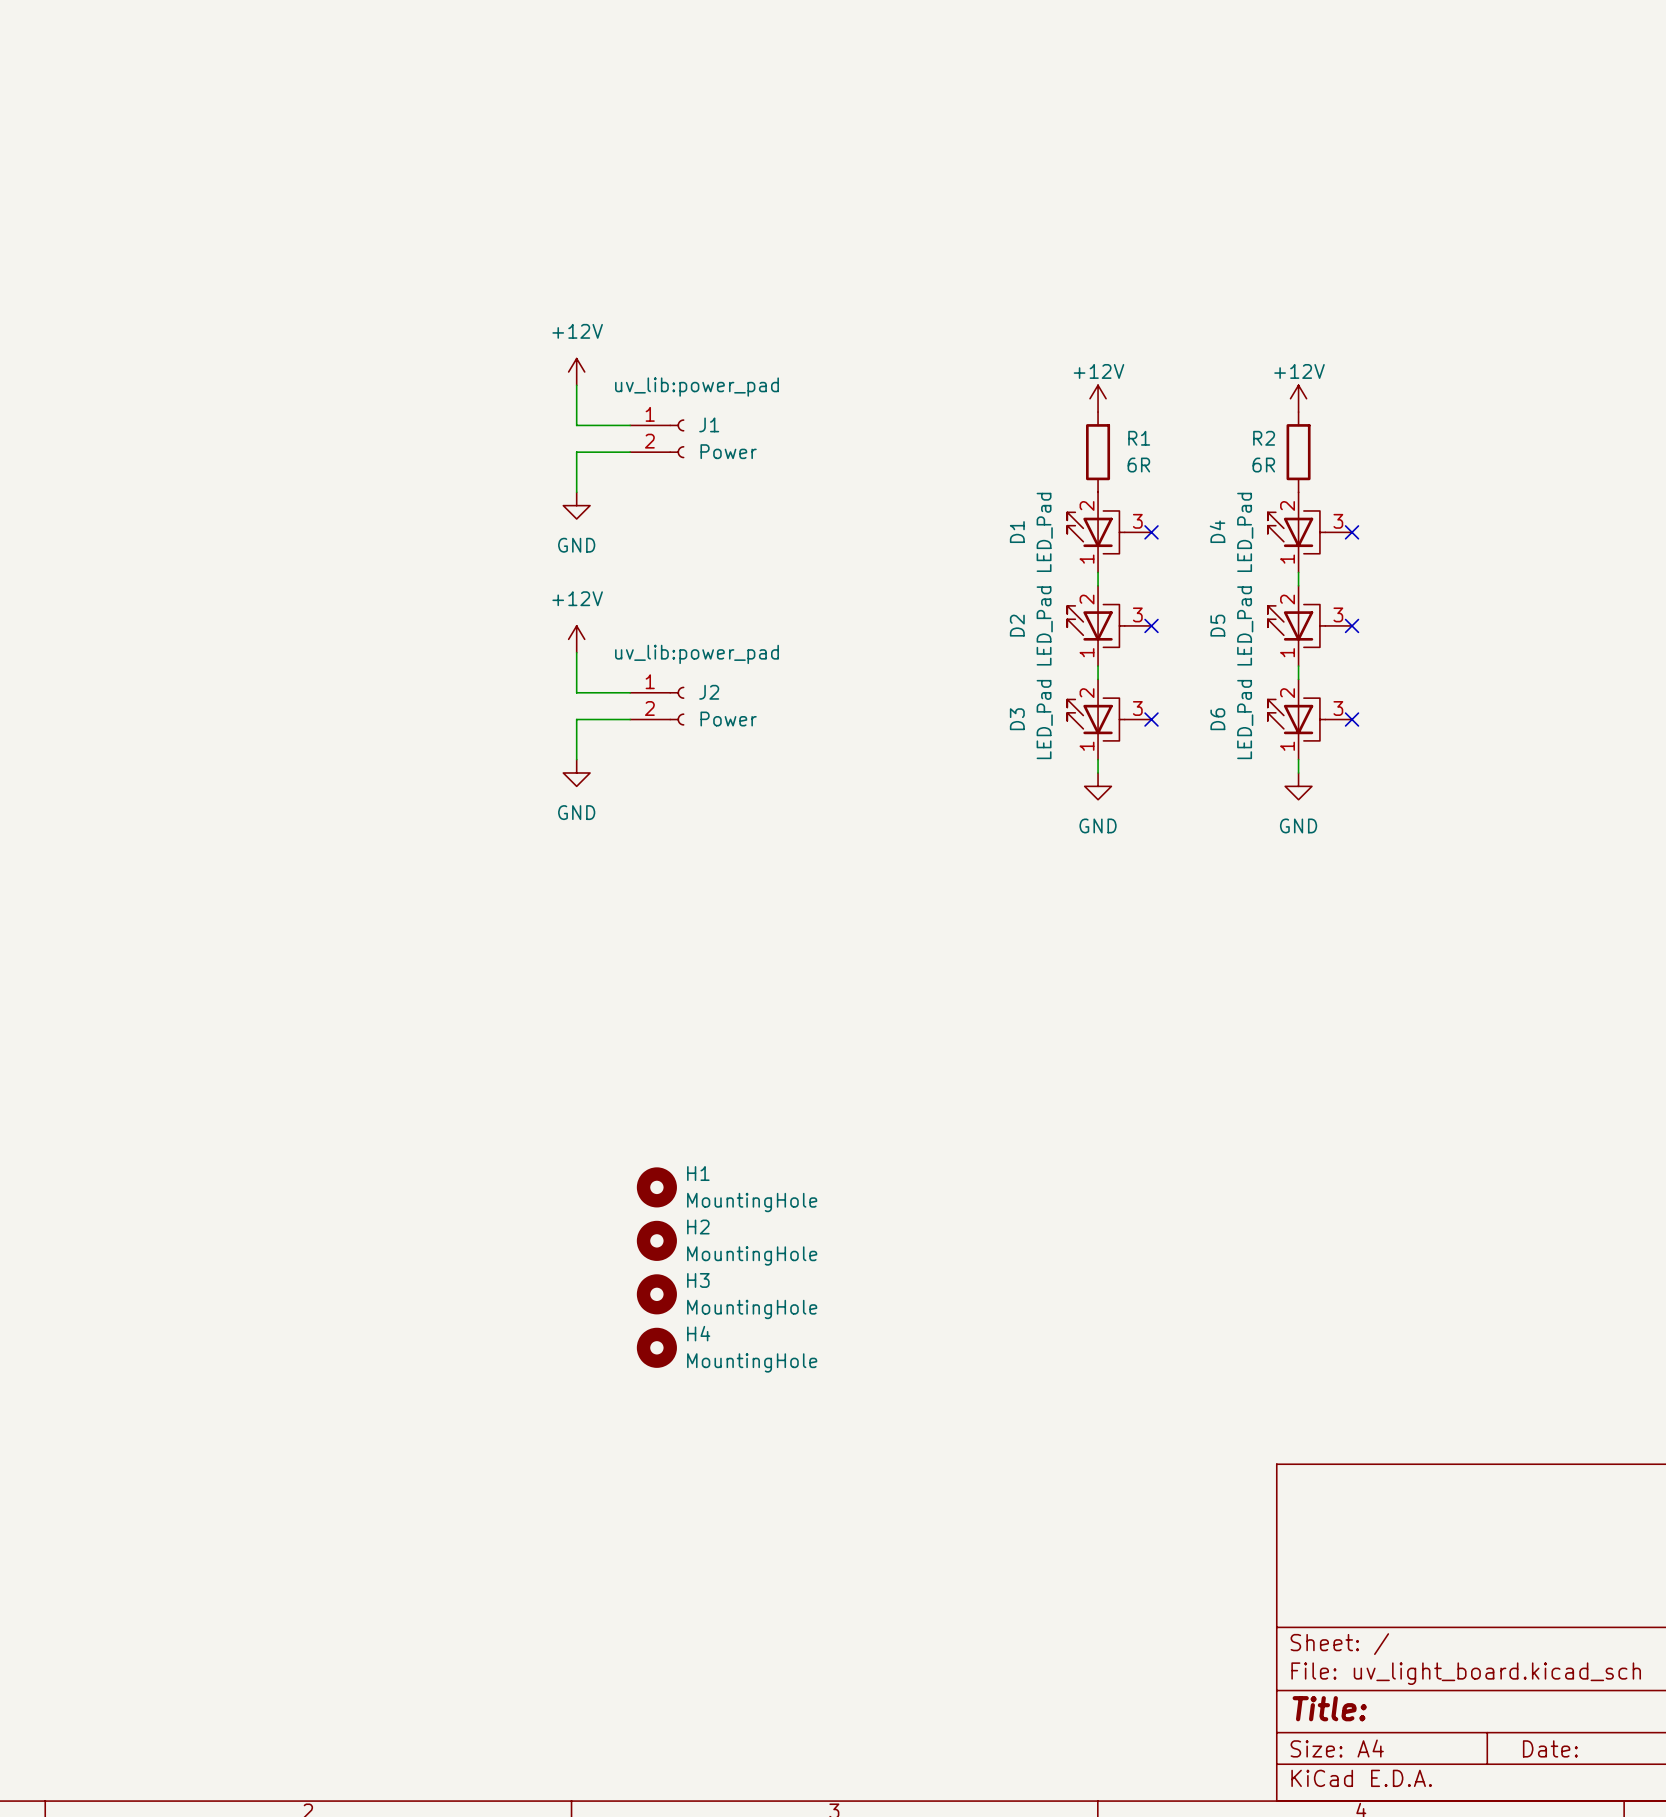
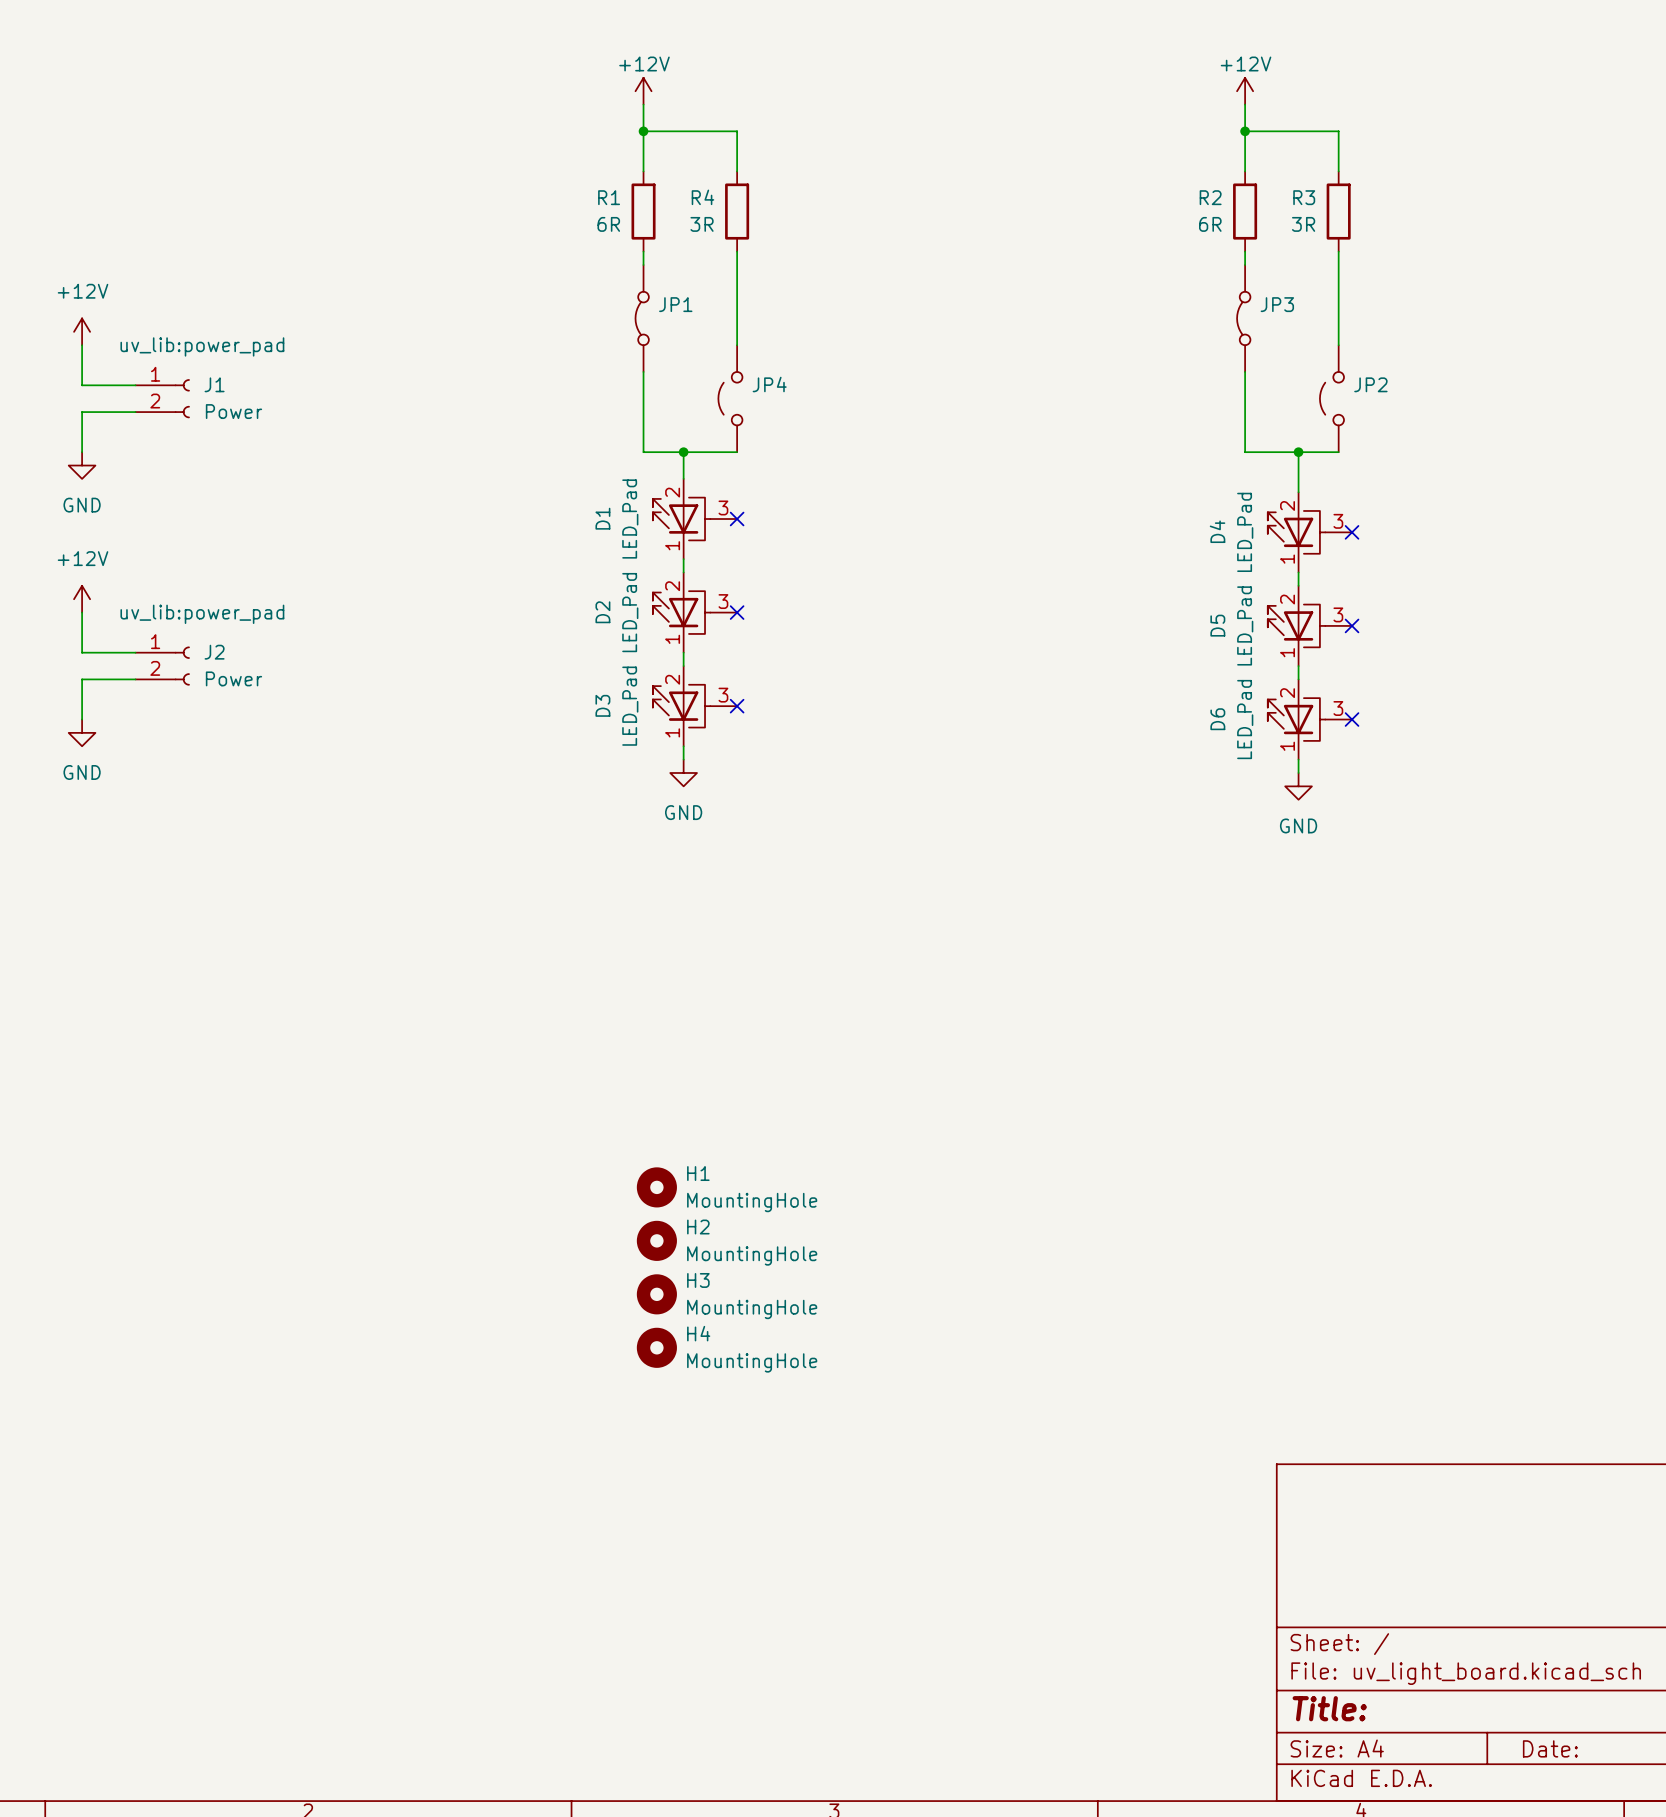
power symbol: none -> +12V (643, 91)
power symbol: none -> +12V (1245, 91)
wire: none -> (643, 104) (643, 171)
wire: none -> (1245, 104) (1245, 171)
wire: none -> (643, 131) (737, 131) (737, 171)
junction: none -> (643, 131)
wire: none -> (1245, 131) (1338, 131) (1338, 171)
junction: none -> (1245, 131)
R4: none -> 3R (737, 211)
R3: none -> 3R (1338, 211)
wire: none -> (643, 251) (643, 265)
wire: none -> (737, 251) (737, 345)
wire: none -> (1245, 251) (1245, 265)
wire: none -> (1338, 251) (1338, 345)
JP1: none -> (642, 318)
JP3: none -> (1243, 318)
power symbol: none -> +12V (82, 331)
wire: none -> (82, 345) (82, 385) (135, 385)
power symbol: +12V (576, 371) -> none
wire: none -> (643, 371) (643, 452) (737, 452)
wire: none -> (1245, 371) (1245, 452) (1338, 452)
wire: (576, 385) (576, 425) (630, 425) -> none
JP4: none -> (730, 398)
power symbol: +12V (1098, 398) -> none
power symbol: +12V (1298, 398) -> none
JP2: none -> (1331, 398)
wire: none -> (135, 412) (82, 412) (82, 452)
J1 position: (657, 438) -> (162, 398)
R1 name position: R1 (1139, 438) -> R1 (609, 197)
wire: (630, 452) (576, 452) (576, 492) -> none
wire: none -> (683, 452) (683, 478)
junction: none -> (683, 452)
R1 position: (1098, 452) -> (643, 211)
wire: none -> (1298, 452) (1298, 492)
R2 position: (1298, 452) -> (1245, 211)
junction: none -> (1298, 452)
power symbol: none -> GND (82, 465)
R1 value position: 6R (1138, 465) -> 6R (608, 224)
power symbol: GND (576, 505) -> none
no-connect mark: none -> (737, 519)
D1 position: (1109, 532) -> (694, 519)
no-connect mark: (1151, 532) -> none
wire: none -> (683, 559) (683, 572)
wire: (1098, 572) (1098, 585) -> none
power symbol: none -> +12V (82, 599)
wire: none -> (82, 612) (82, 652) (135, 652)
no-connect mark: none -> (737, 612)
D2 position: (1109, 625) -> (694, 612)
no-connect mark: (1151, 625) -> none
power symbol: +12V (576, 639) -> none
wire: (576, 652) (576, 692) (630, 692) -> none
wire: none -> (683, 652) (683, 666)
wire: (1098, 666) (1098, 679) -> none
wire: none -> (135, 679) (82, 679) (82, 719)
J2 position: (657, 706) -> (162, 666)
no-connect mark: none -> (737, 706)
wire: (630, 719) (576, 719) (576, 759) -> none
D3 position: (1109, 719) -> (694, 706)
no-connect mark: (1151, 719) -> none
power symbol: none -> GND (82, 732)
wire: none -> (683, 746) (683, 759)
wire: (1098, 759) (1098, 772) -> none
power symbol position: GND (576, 772) -> GND (683, 772)
power symbol: GND (1098, 786) -> none

